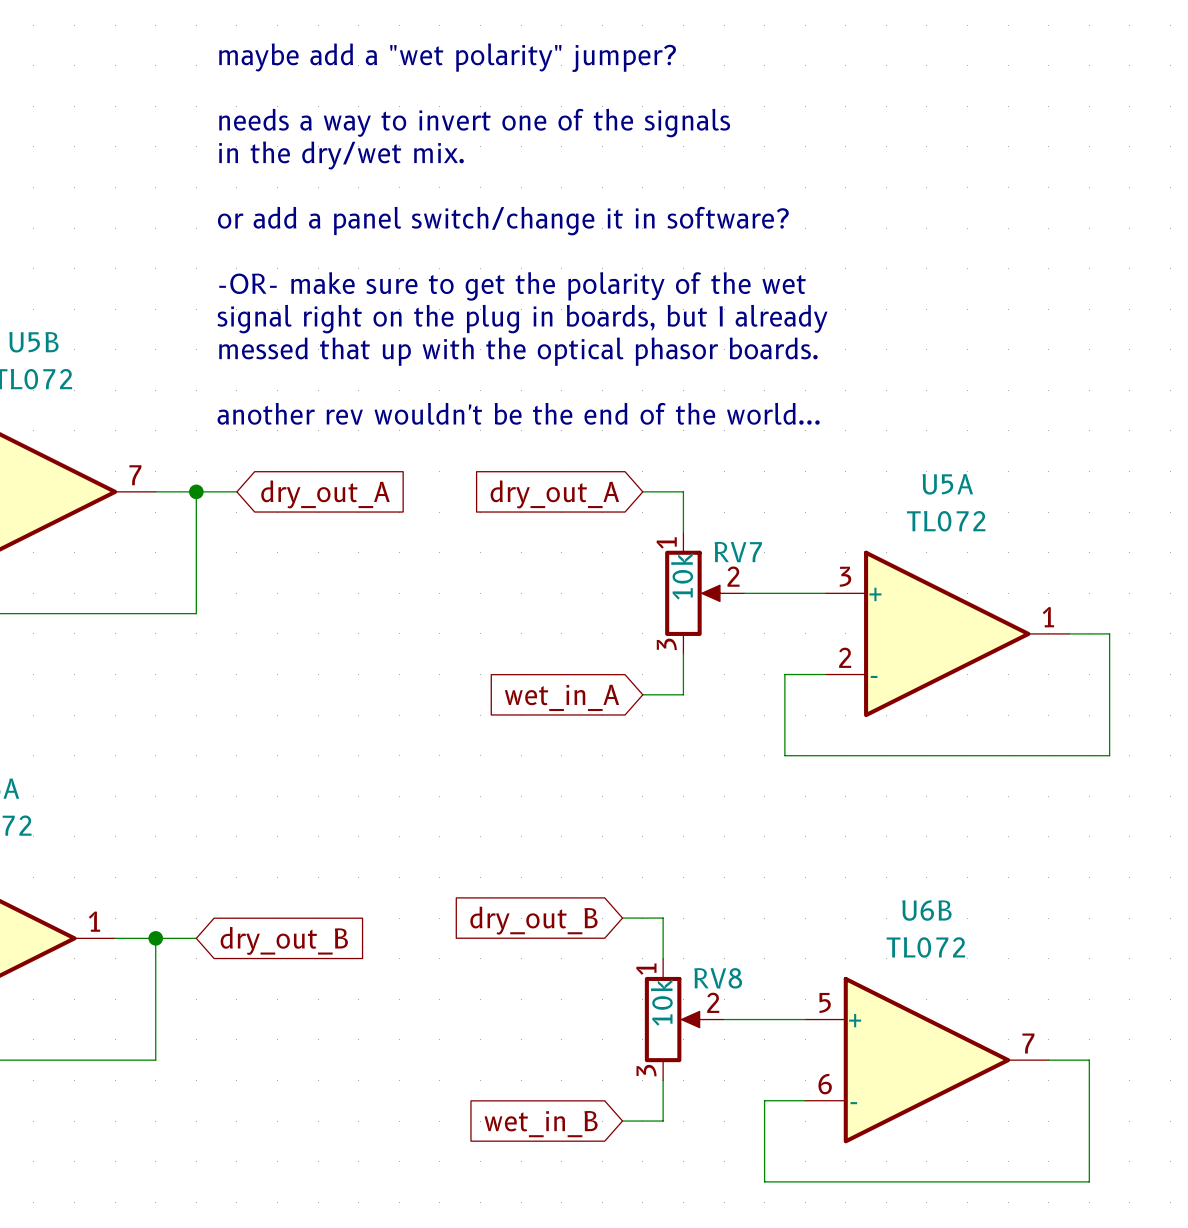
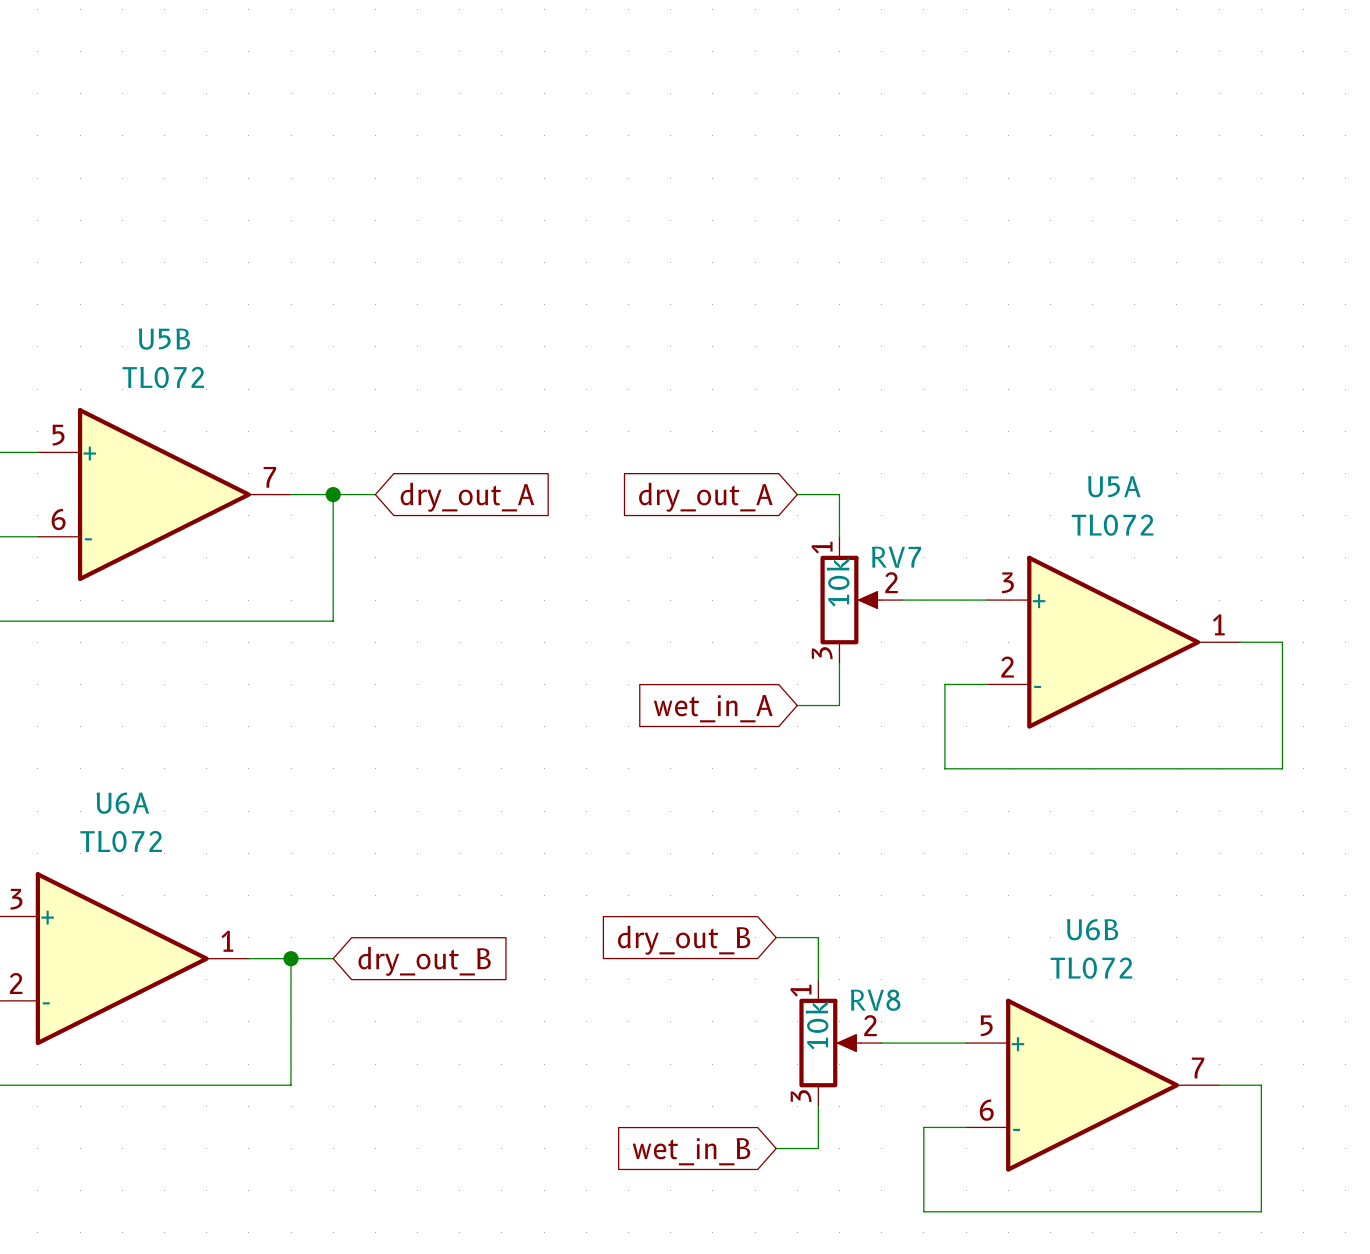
text: maybe add a "wet polarity" jumper? (447, 57) -> none
text: needs a way to invert one of the signals (474, 123) -> none
text: in the dry/wet mix. (341, 155) -> none
text: or add a panel switch/change it in software? (503, 221) -> none
text: -OR- make sure to get the polarity of the wet (512, 286) -> none
text: signal right on the plug in boards, but I already (522, 319) -> none
text: messed that up with the optical phasor boards. (518, 351) -> none
text: another rev wouldn't be the end of the world... (518, 413) -> none

